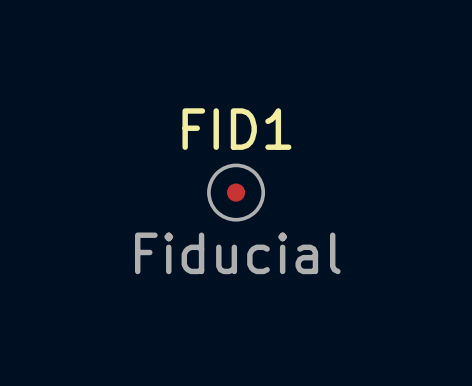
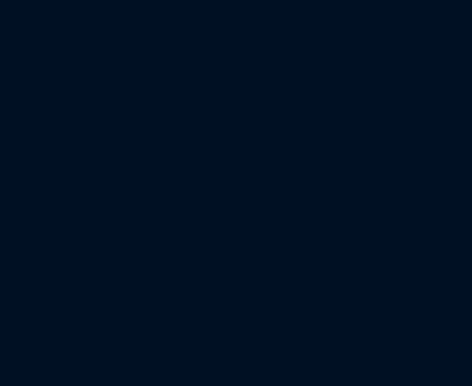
FID1: Fiducial (236, 192) -> none

